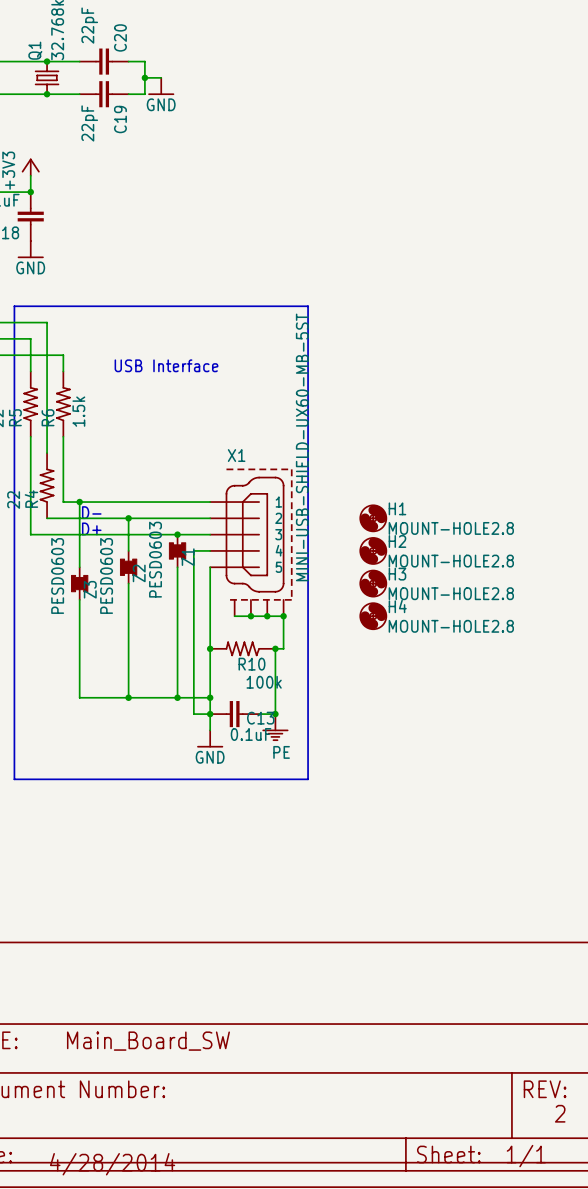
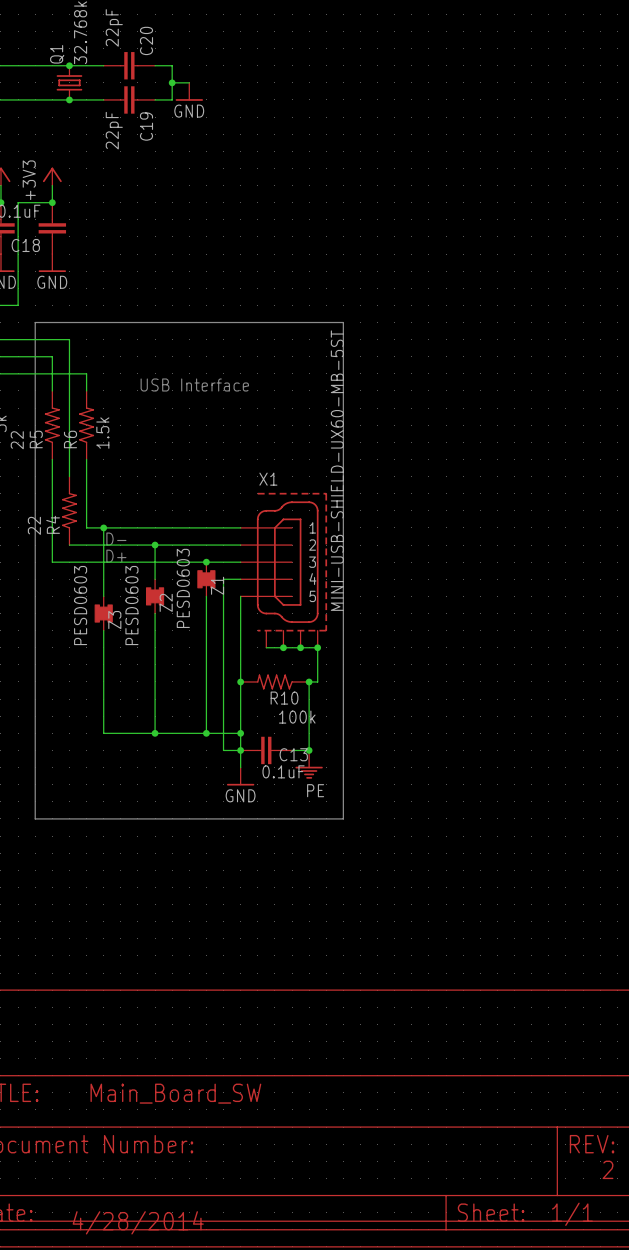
H1: MOUNT-HOLE2.8 (373, 518) -> none
H2: MOUNT-HOLE2.8 (373, 550) -> none
H3: MOUNT-HOLE2.8 (373, 583) -> none
H4: MOUNT-HOLE2.8 (373, 616) -> none

